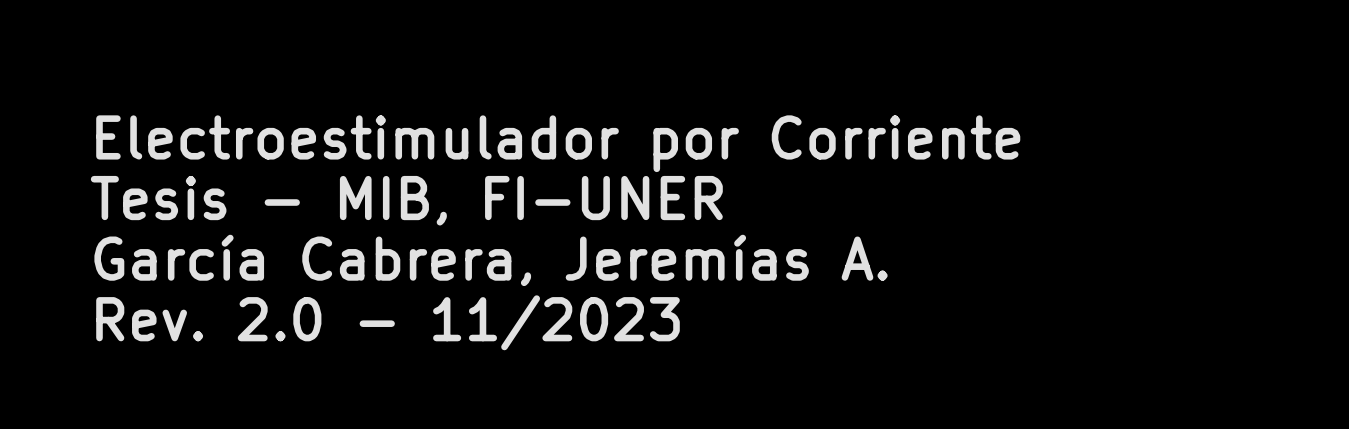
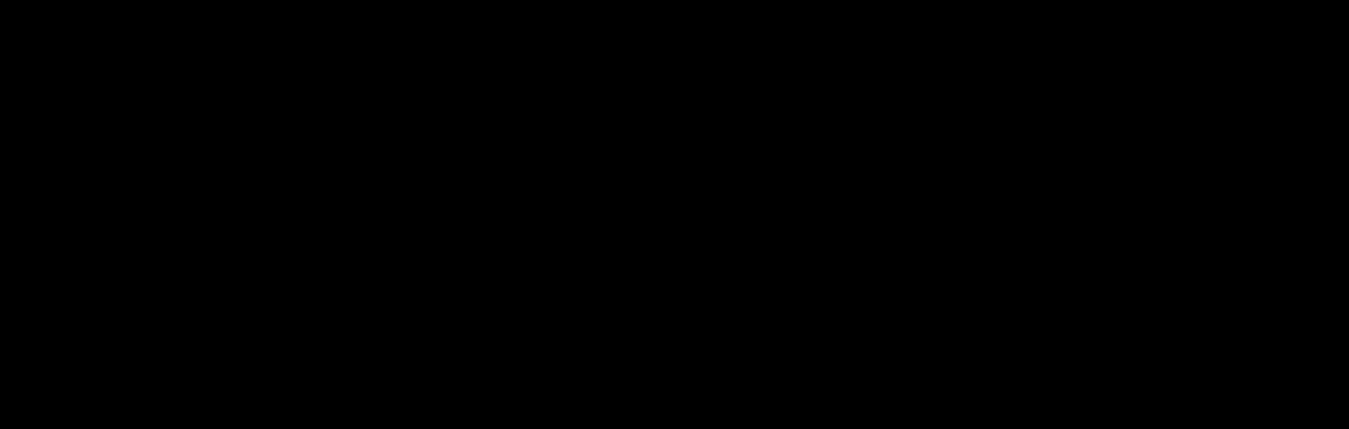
text: Electroestimulador por Corriente (558, 143) -> none
text: Tesis - MIB, FI-UNER (406, 200) -> none
text: García Cabrera, Jeremías A. (491, 260) -> none
text: Rev. 2.0 - 11/2023 (388, 322) -> none

